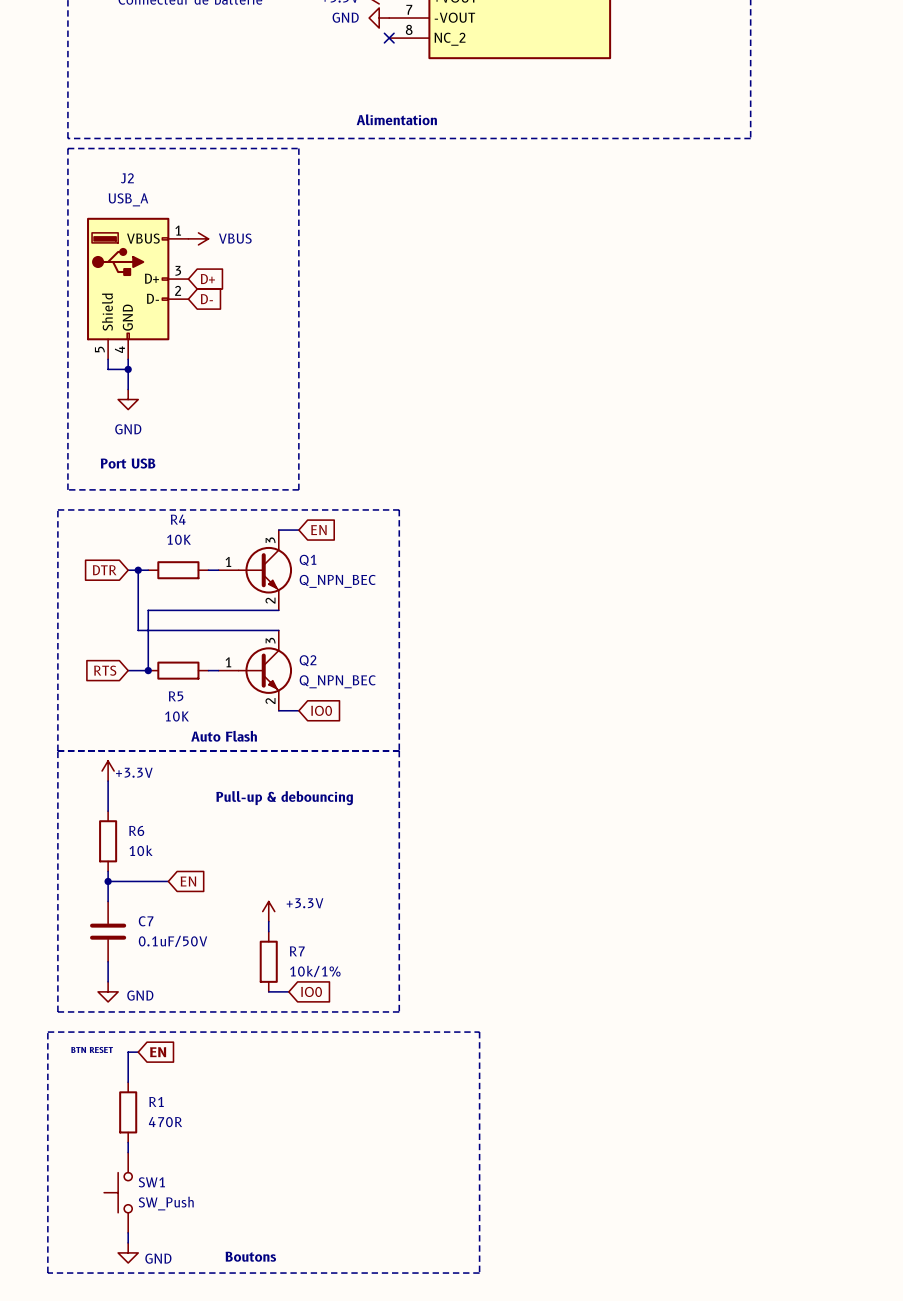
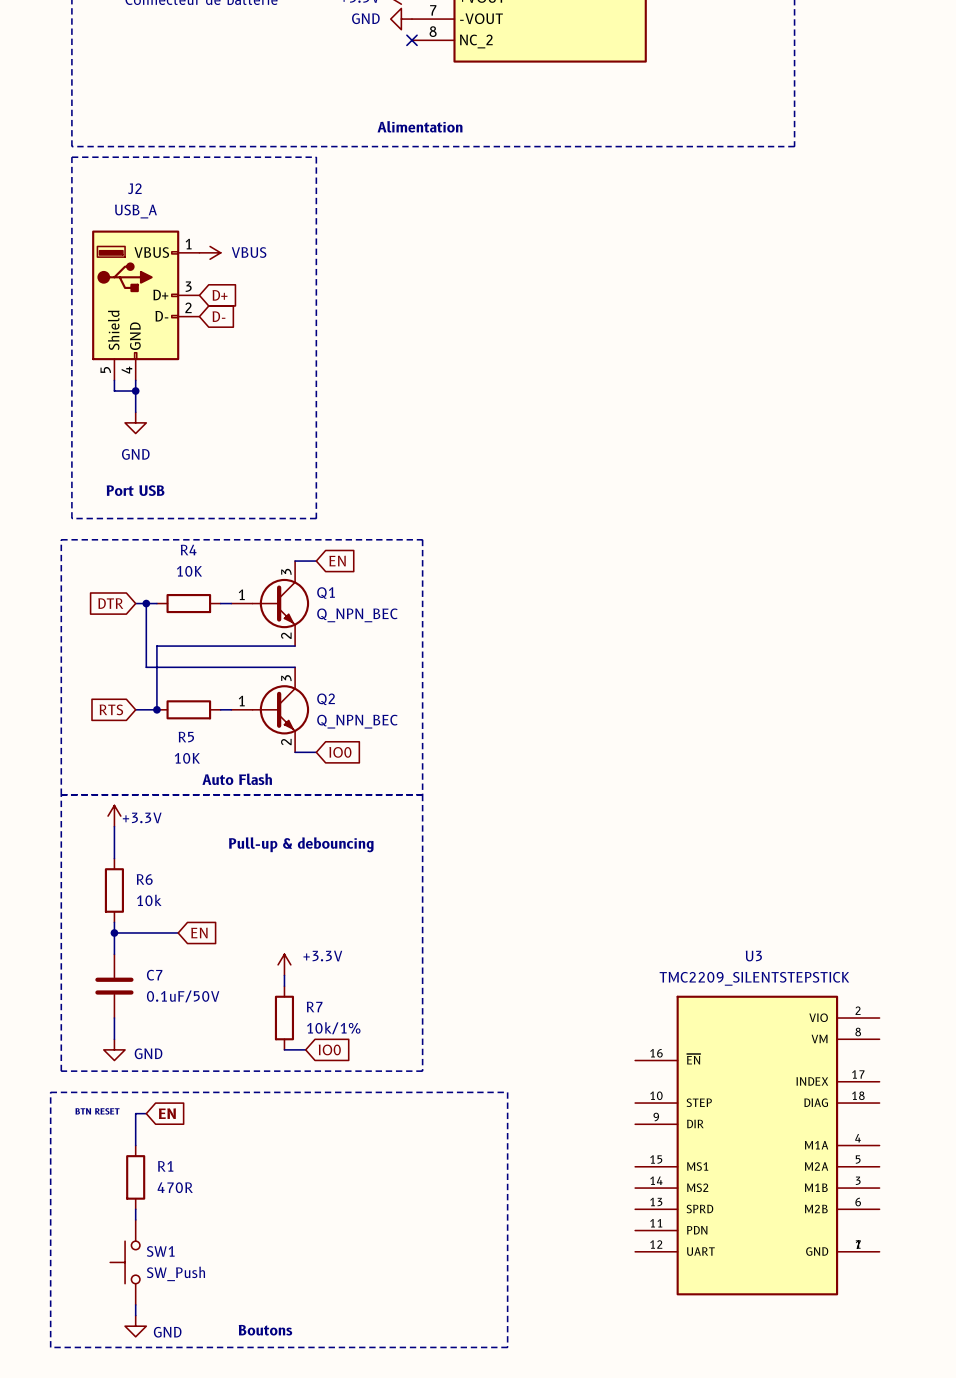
U3: none -> TMC2209_SILENTSTEPSTICK (757, 1145)

